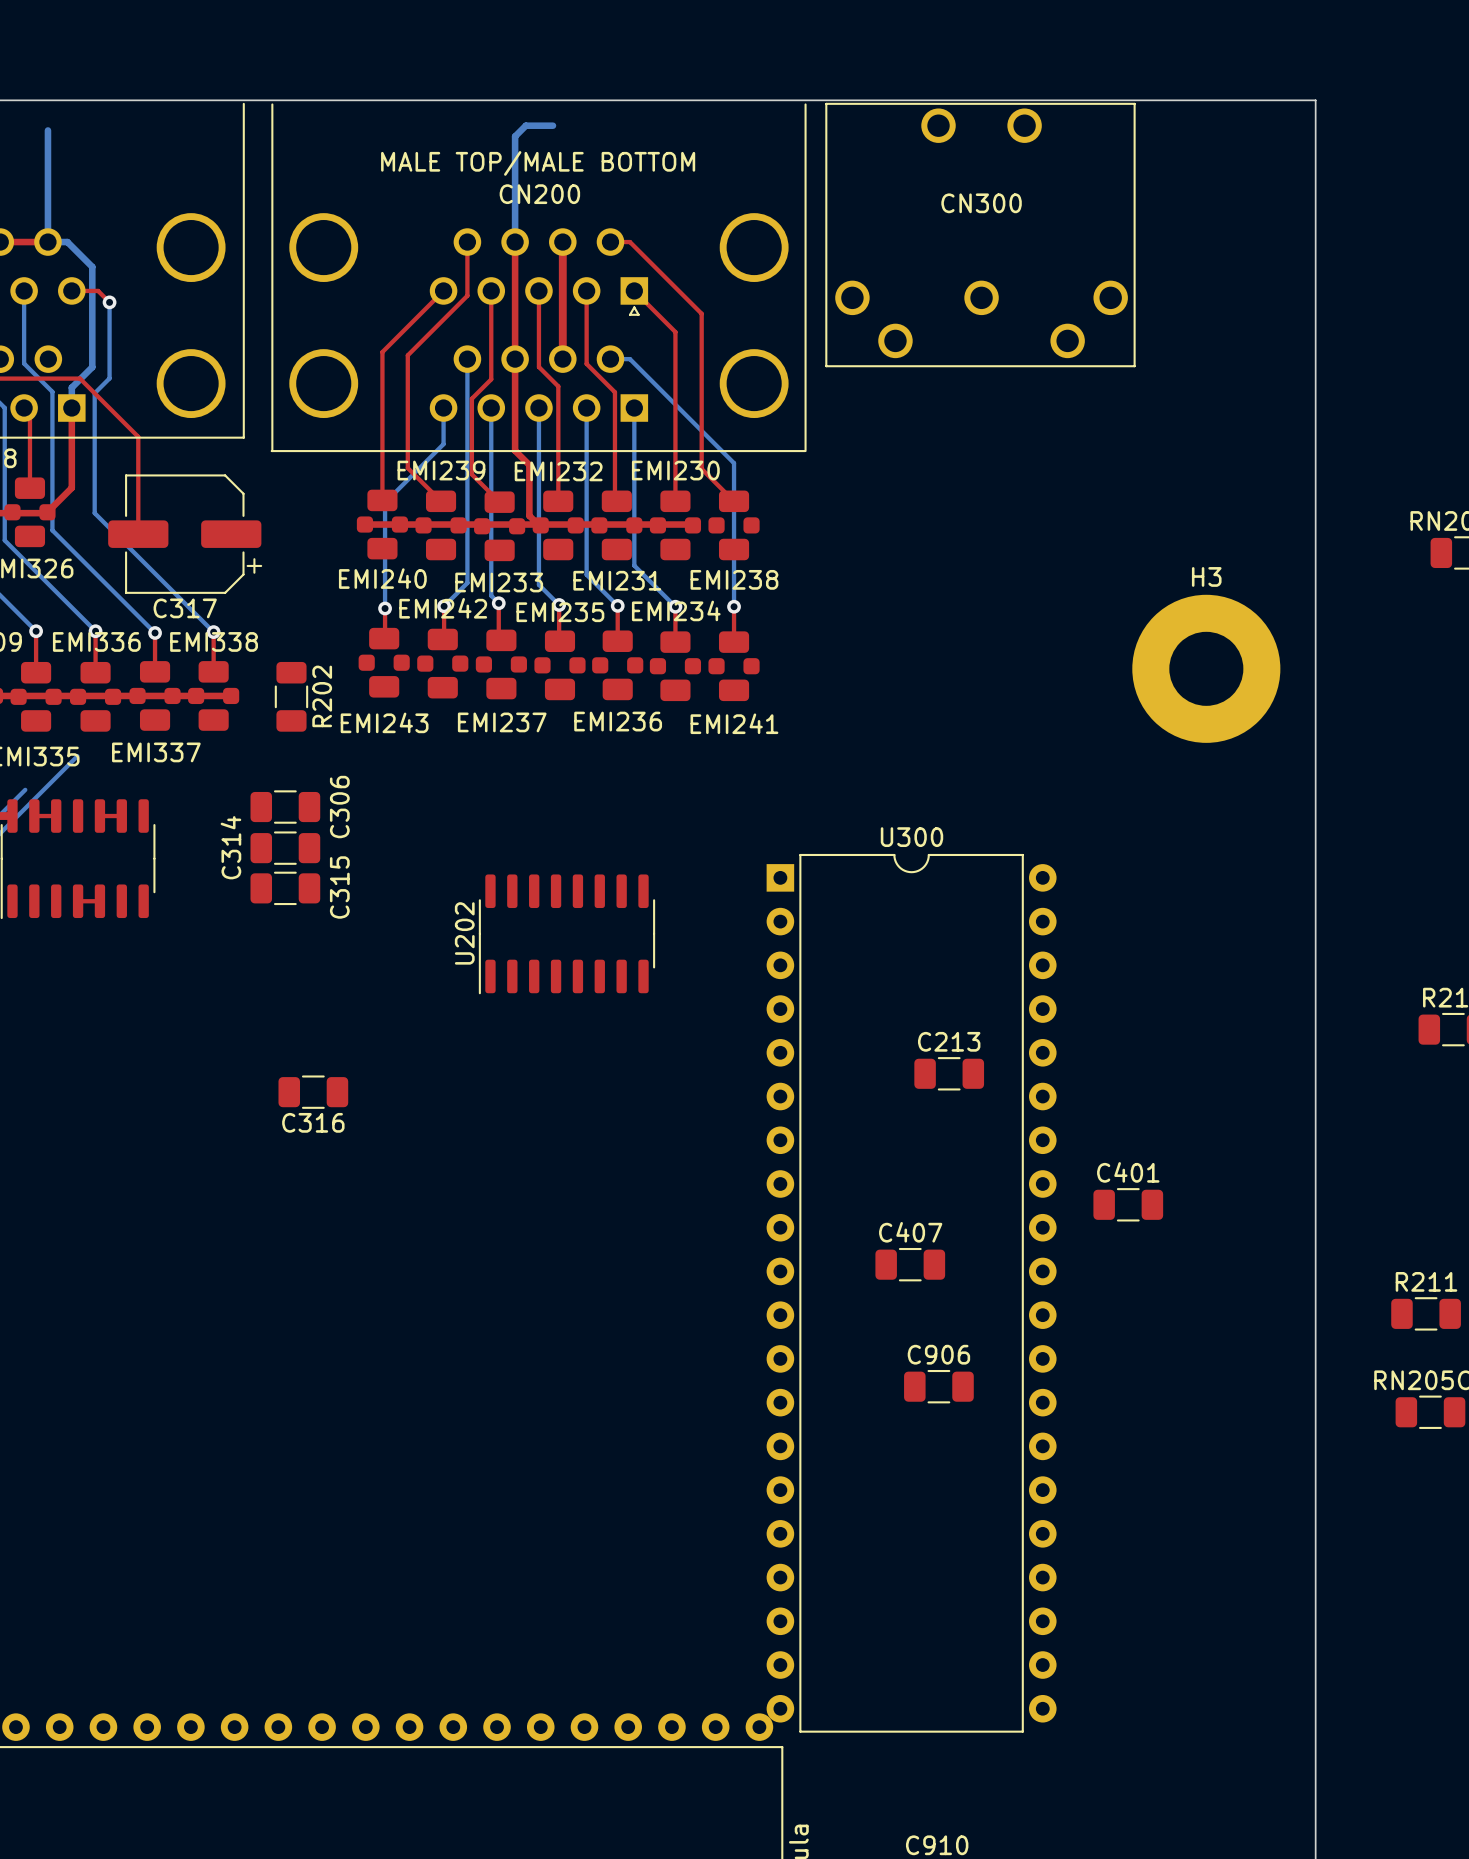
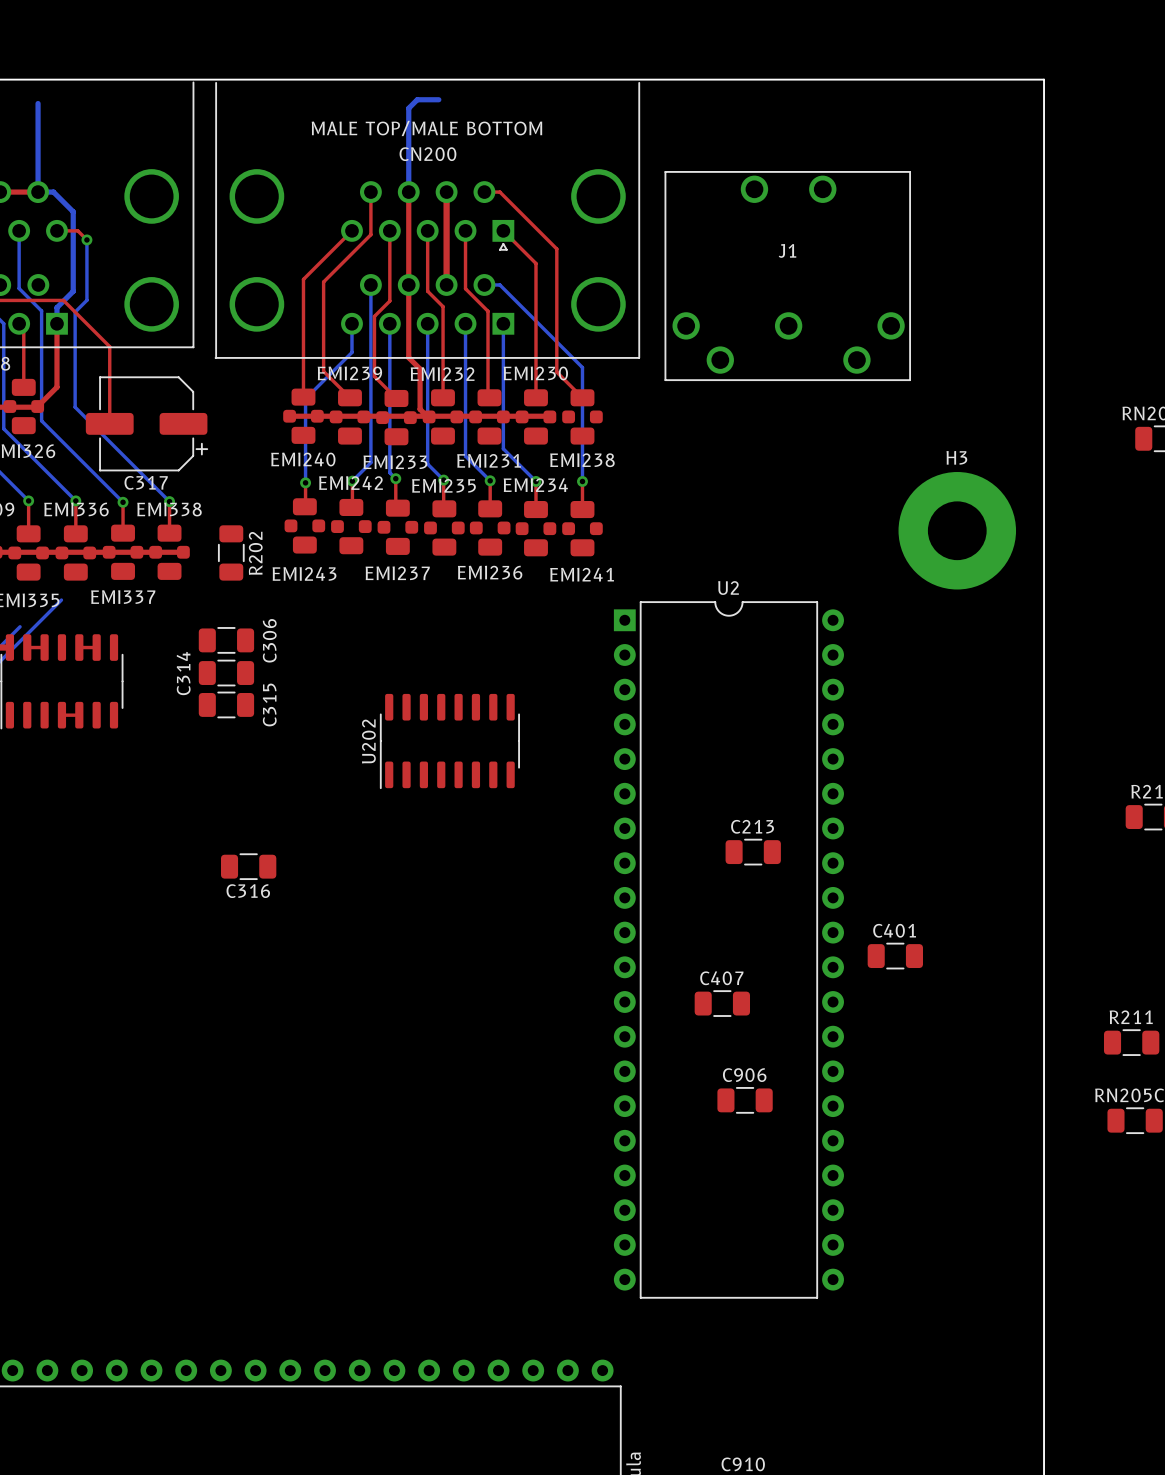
CN300: (980, 235) -> none
J1: none -> (787, 276)
U2: none -> (728, 949)
U300: (911, 1293) -> none

